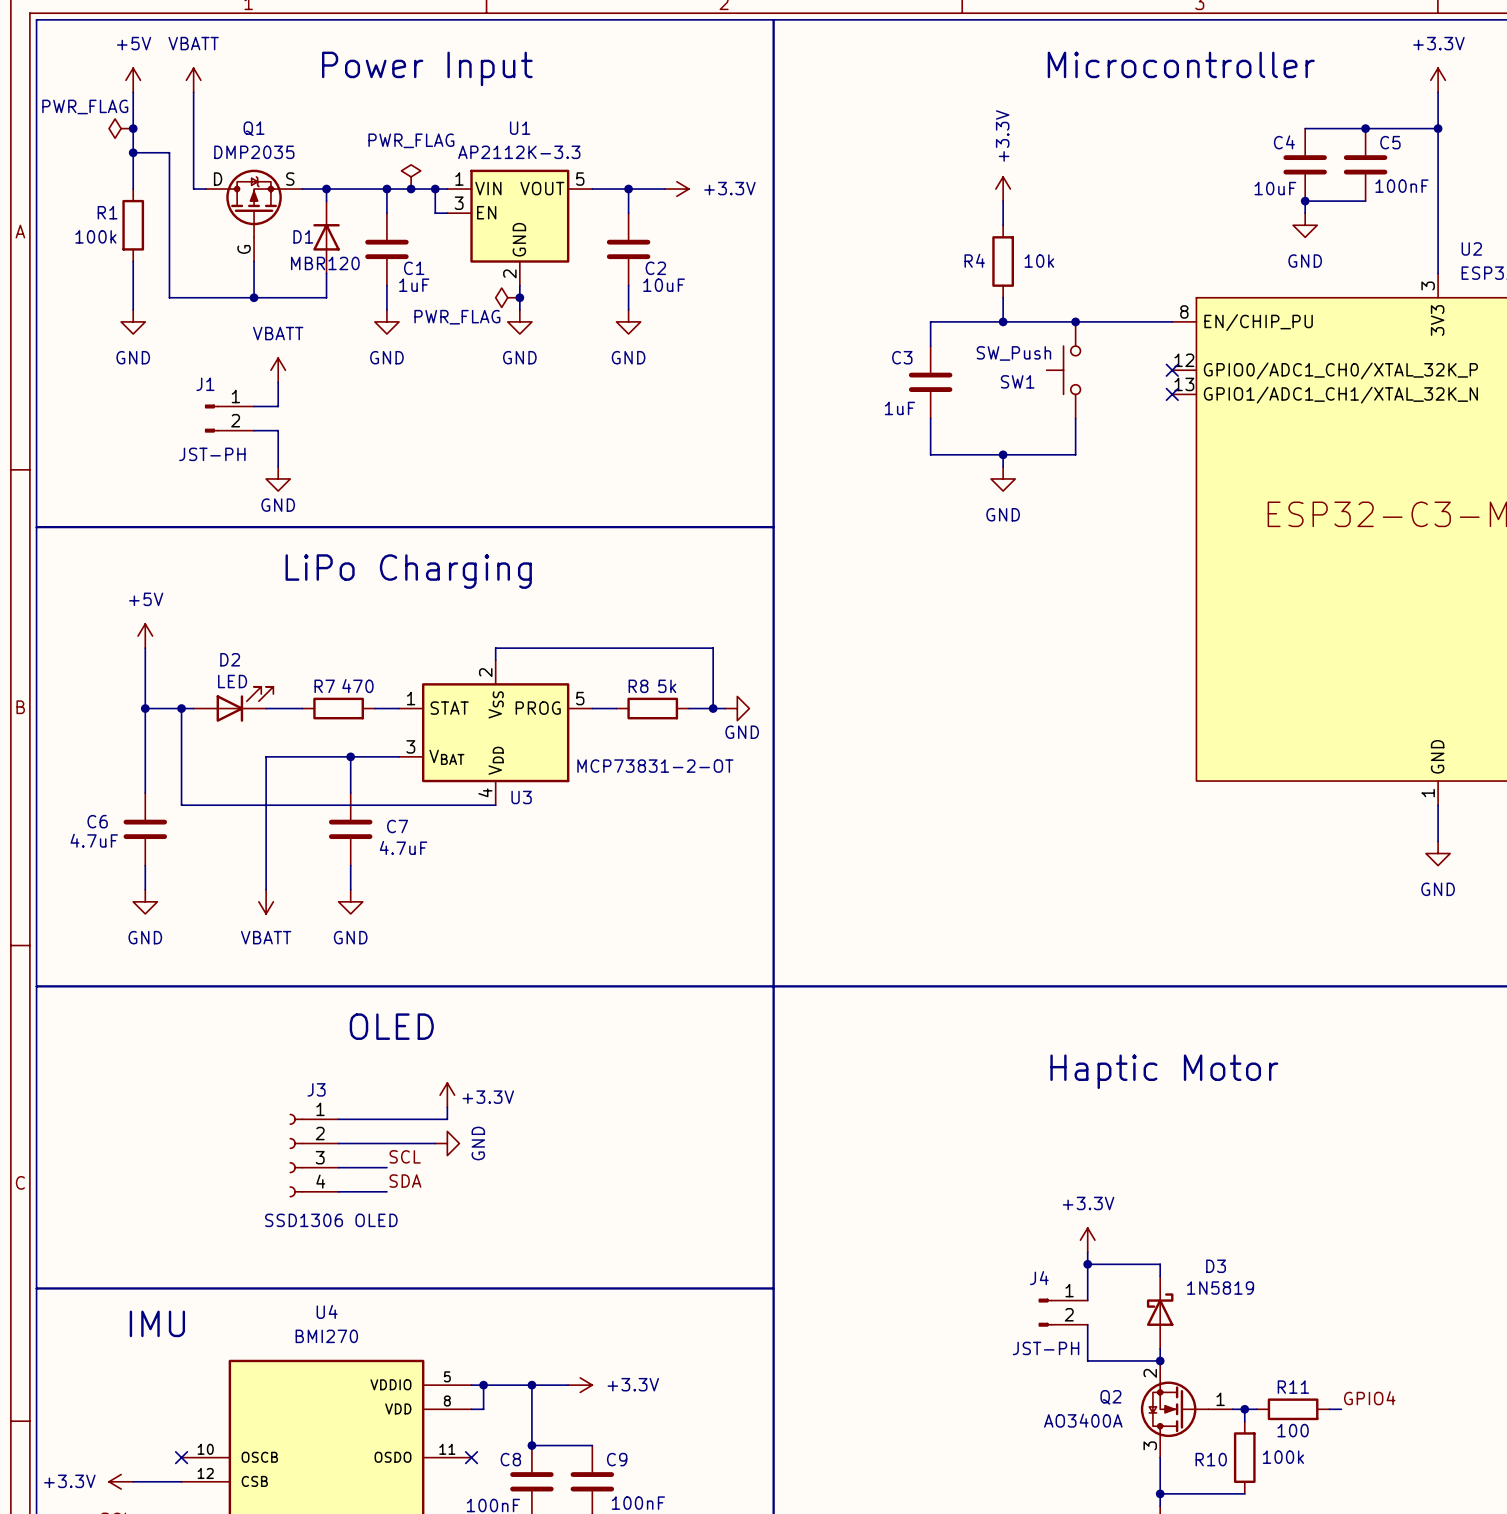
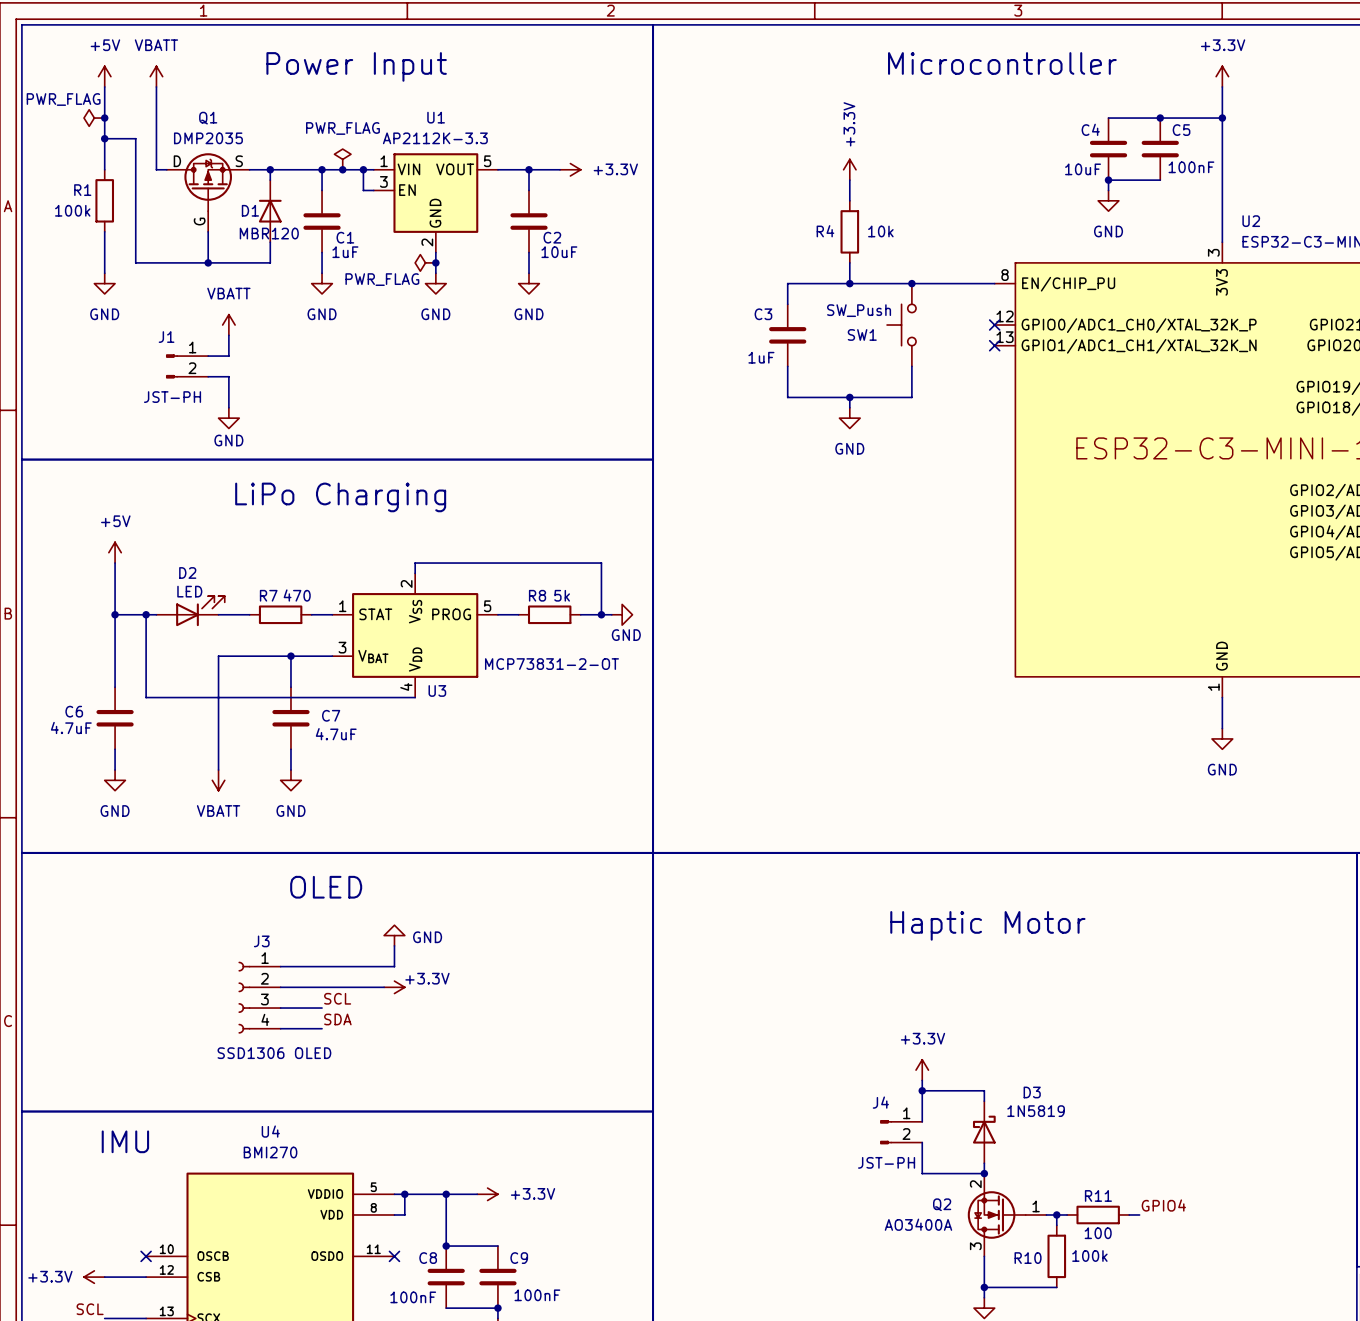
power symbol rotation: 0° (447, 1095) -> 90° clockwise (394, 987)
power symbol position: +3.3V (447, 1095) -> +3.3V (394, 987)
wire: (447, 1107) (447, 1119) -> (394, 945) (394, 966) (373, 966)
power symbol rotation: 0° (447, 1143) -> 90° counterclockwise (394, 935)
power symbol position: GND (447, 1143) -> GND (394, 935)

